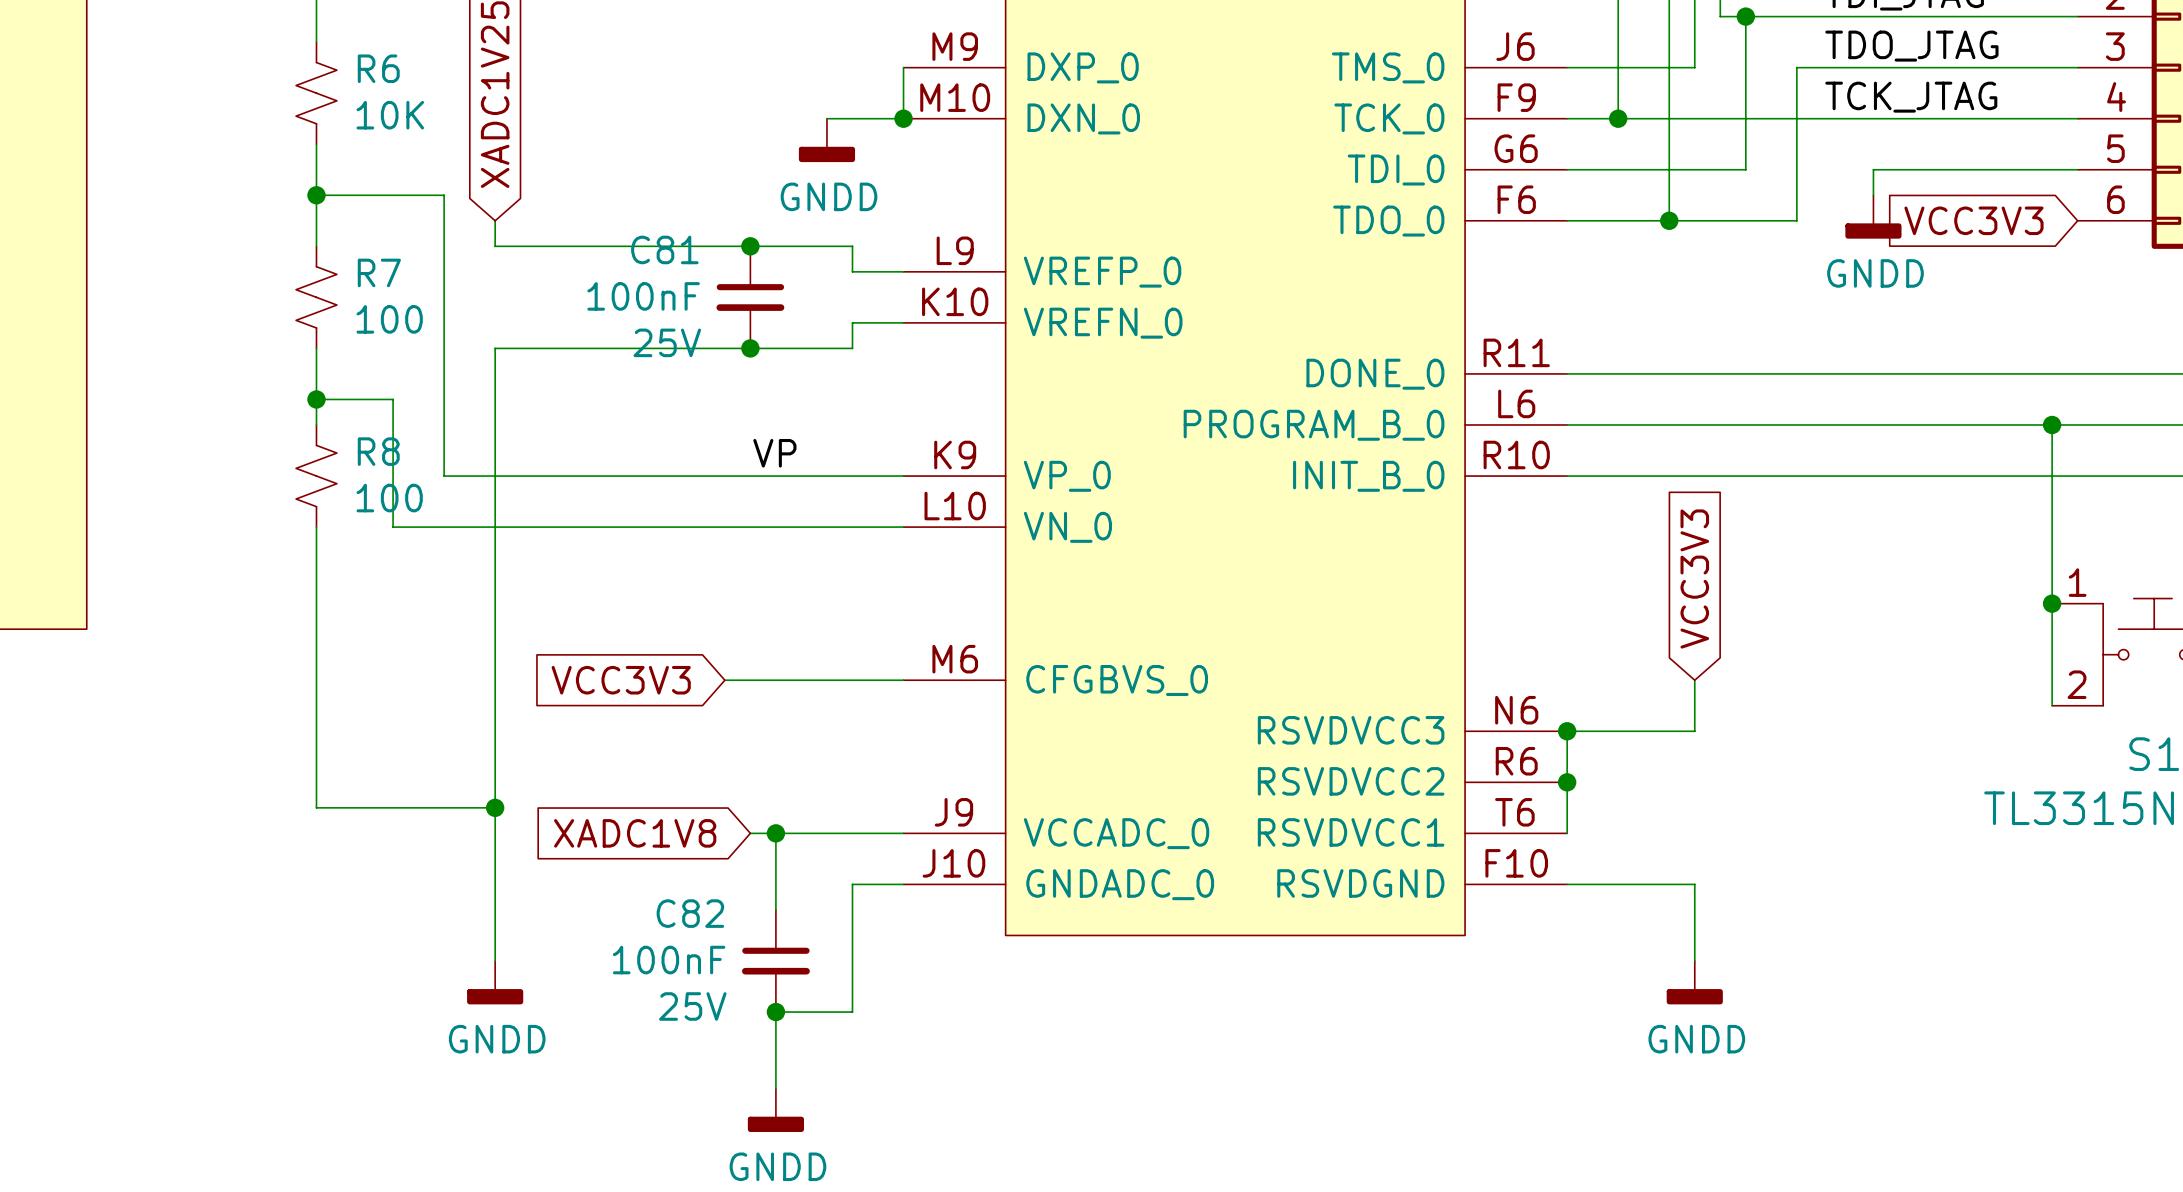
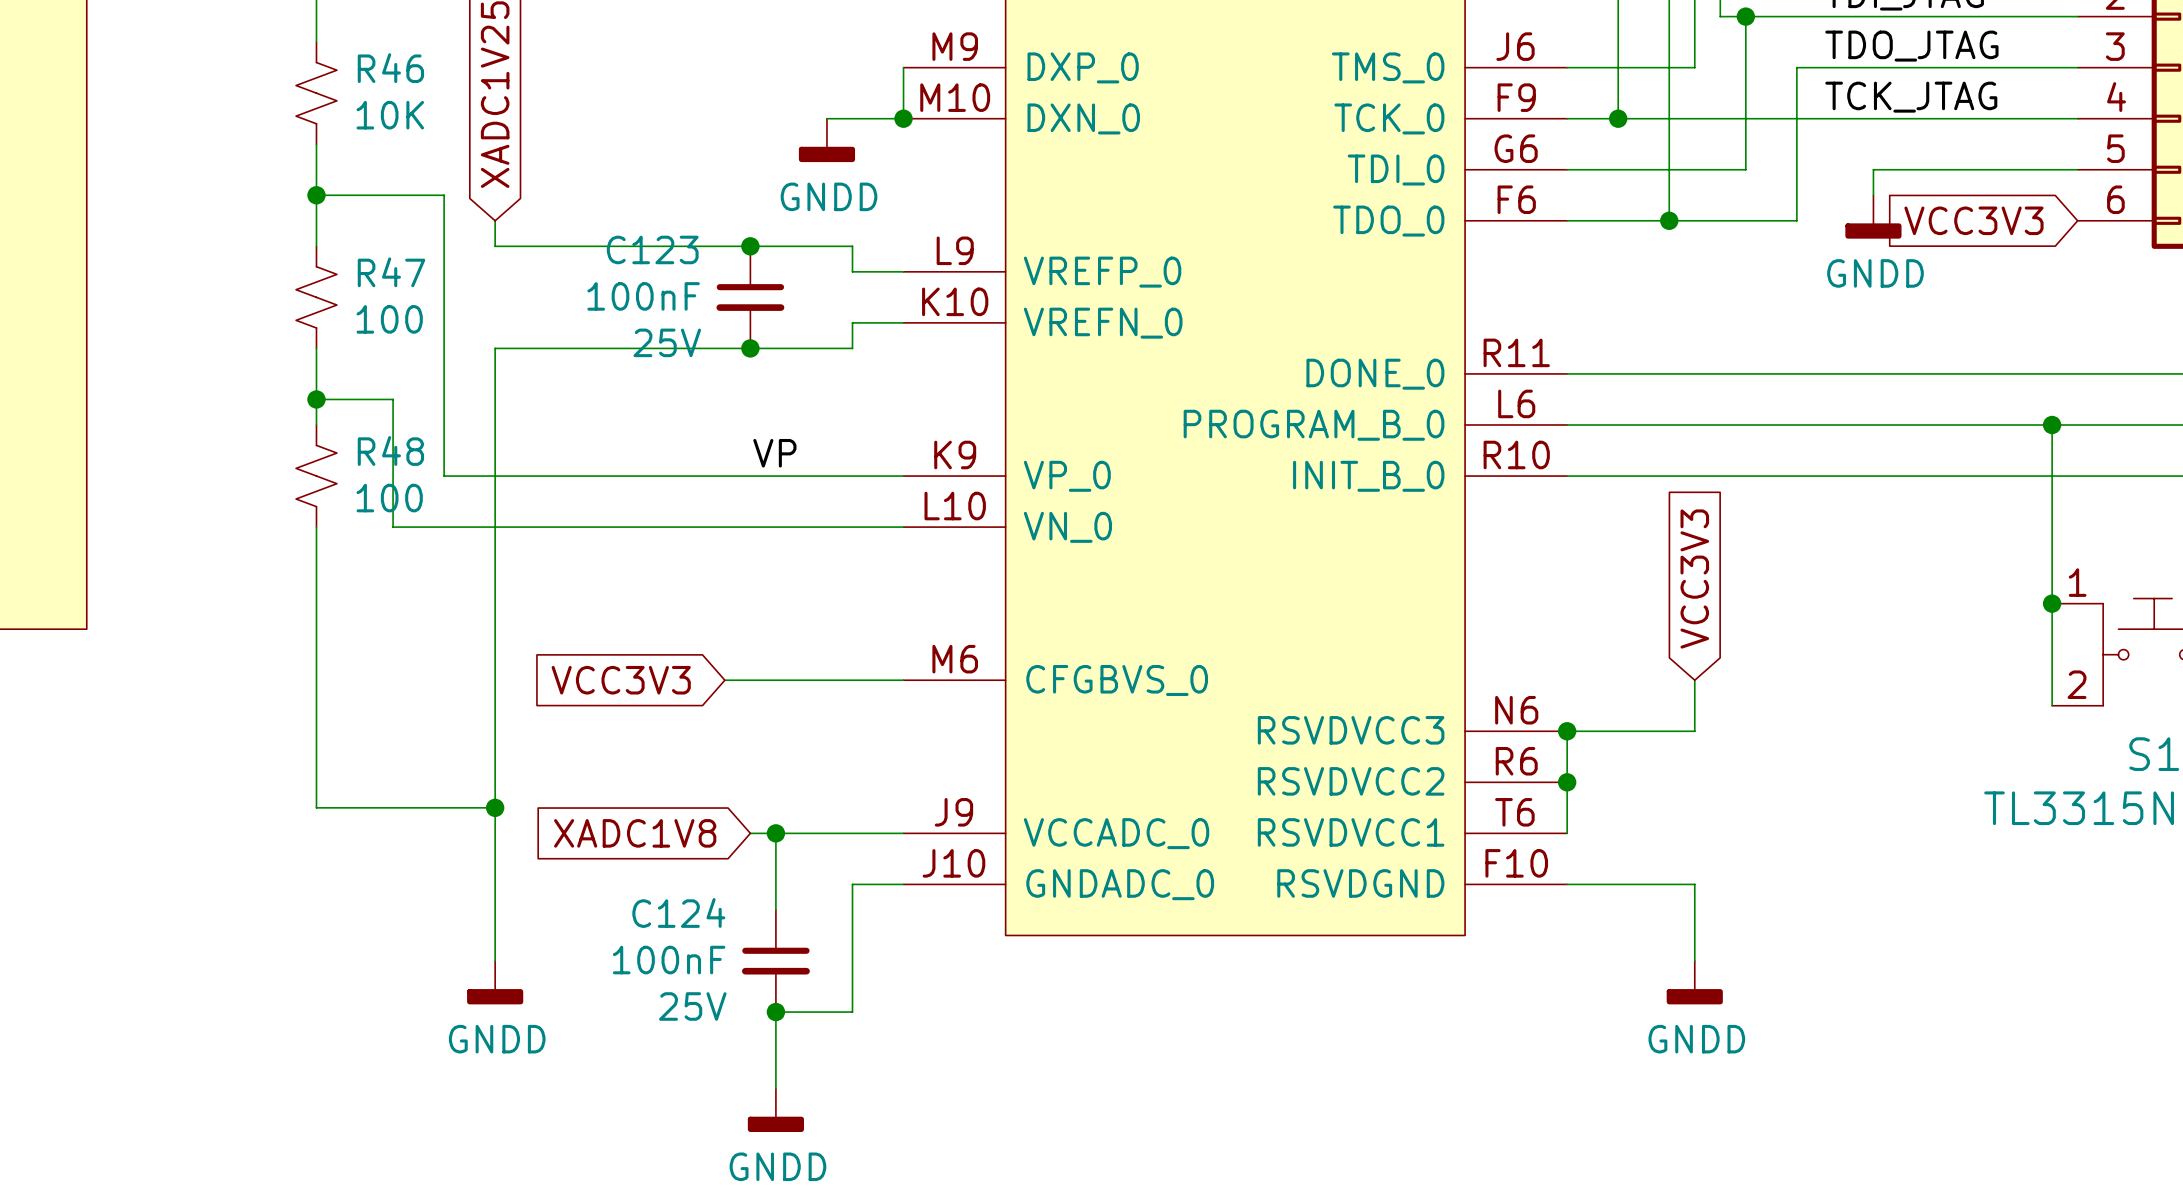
R6 name: R6 (378, 68) -> R46 (390, 68)
C81 name: C81 (664, 249) -> C123 (652, 249)
R7 name: R7 (379, 272) -> R47 (391, 272)
R8 name: R8 (378, 451) -> R48 (390, 450)
C82 name: C82 (690, 913) -> C124 (678, 912)

